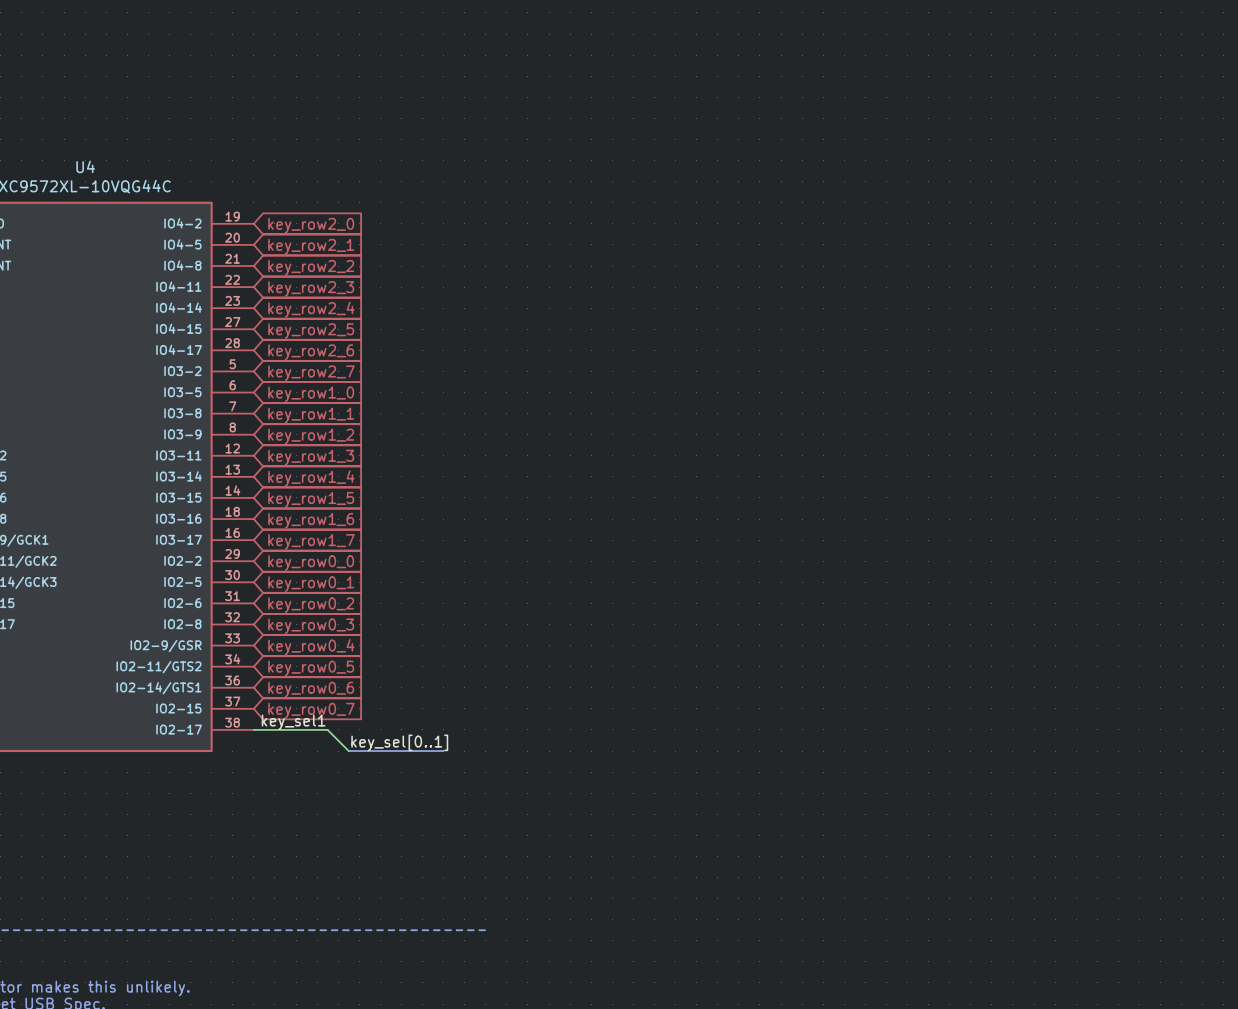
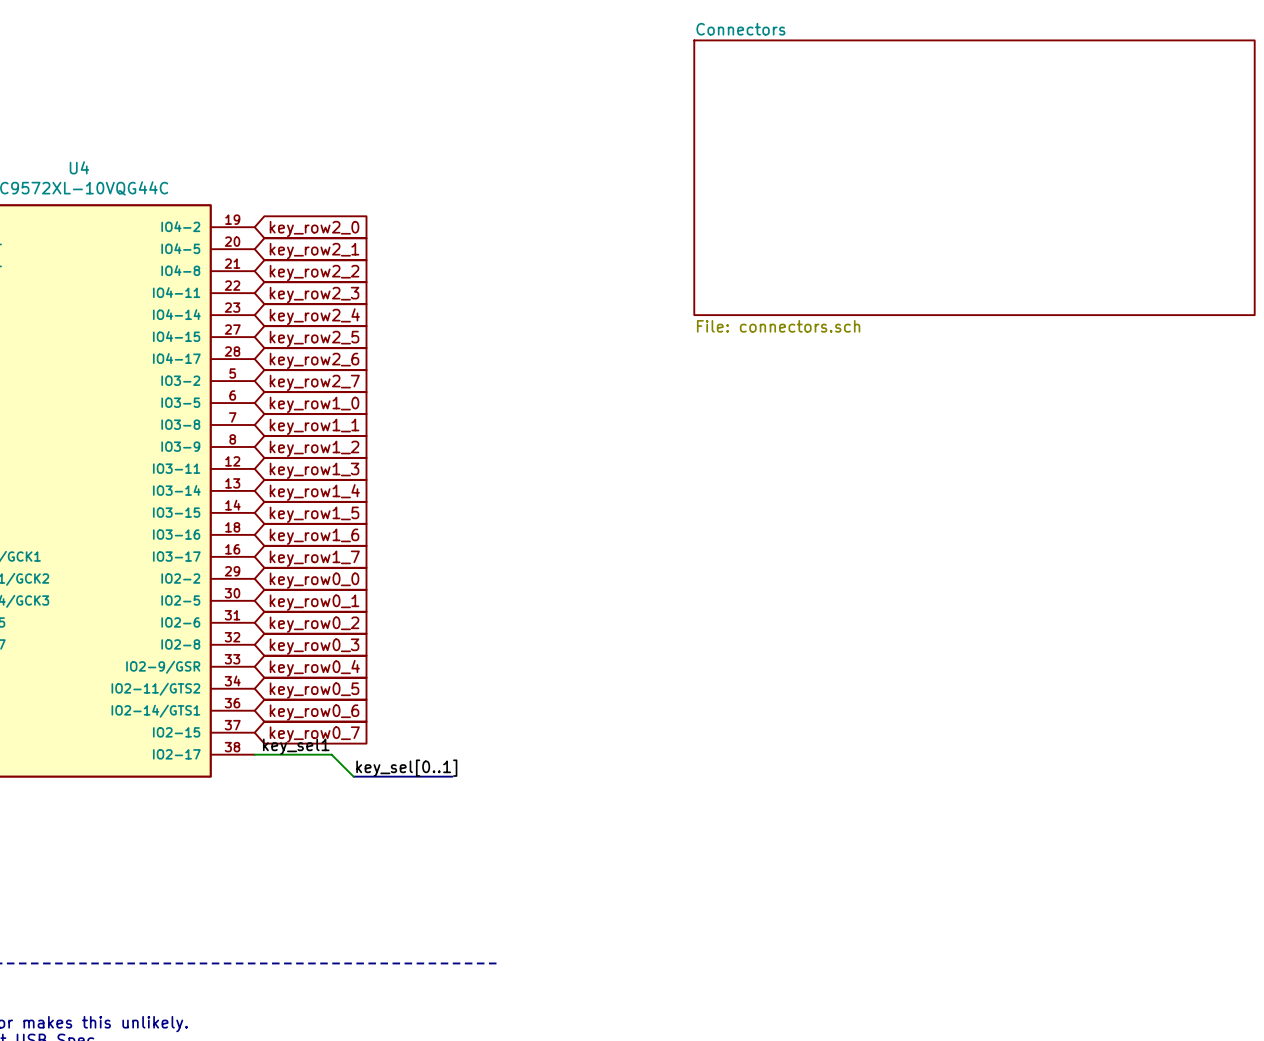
sheet Connectors: none -> File: connectors.sch (974, 177)

